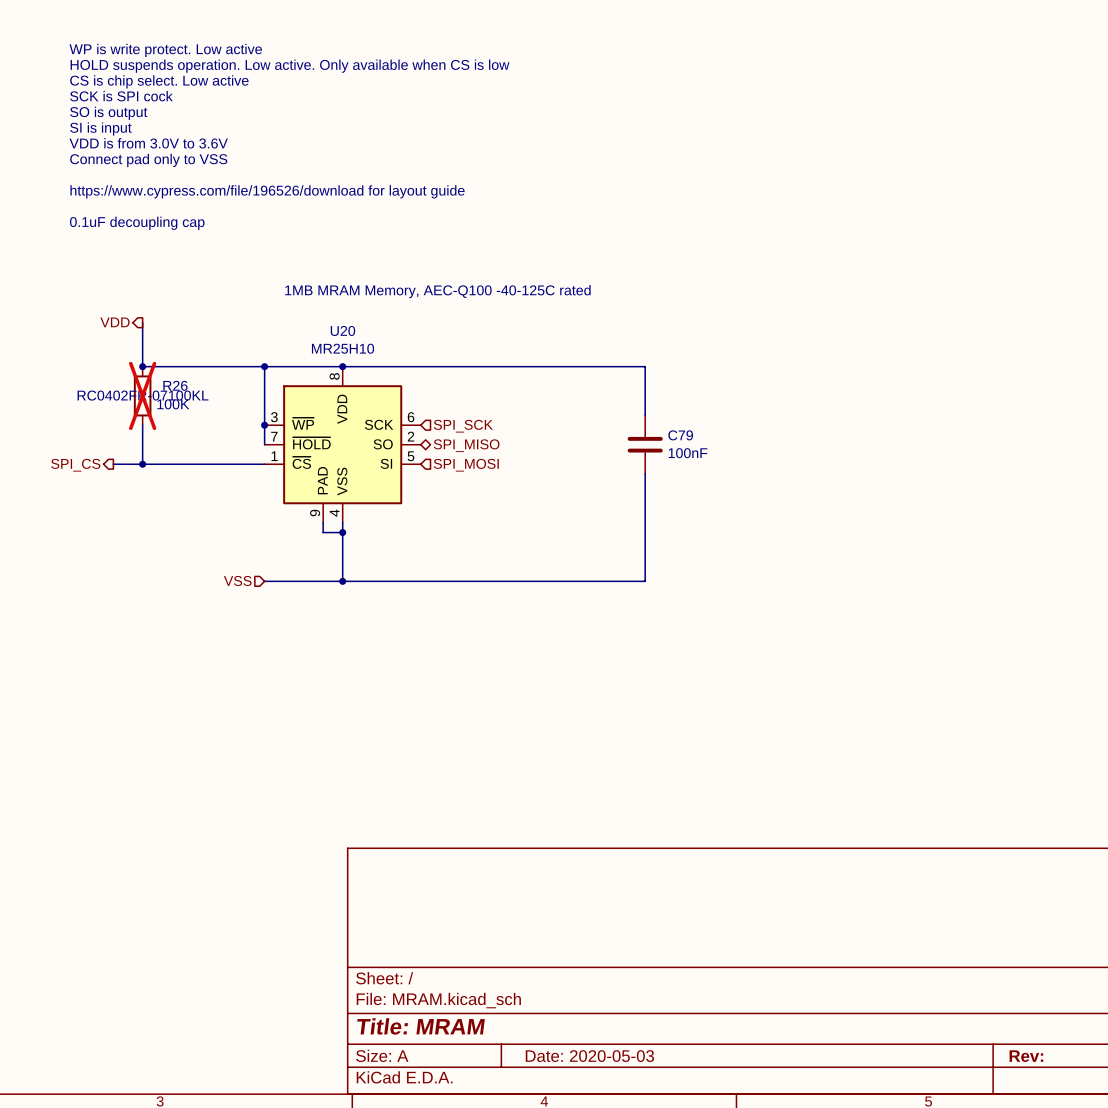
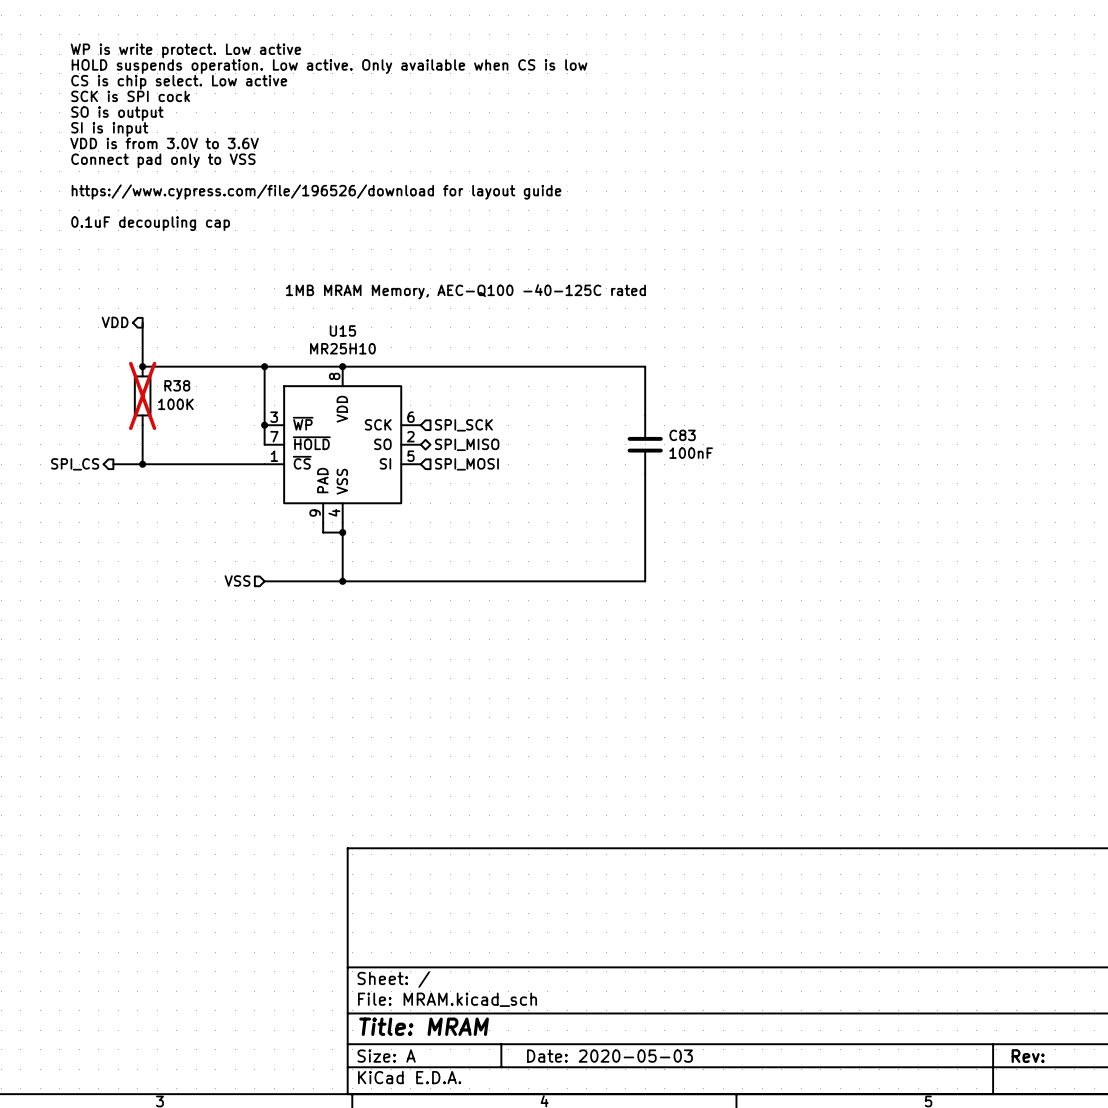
U20 name: U20 (342, 330) -> U15 (342, 330)
R26 name: R26 (175, 385) -> R38 (177, 385)
R26 text: RC0402FR-07100KL (142, 395) -> none
C79 name: C79 (680, 435) -> C83 (682, 435)

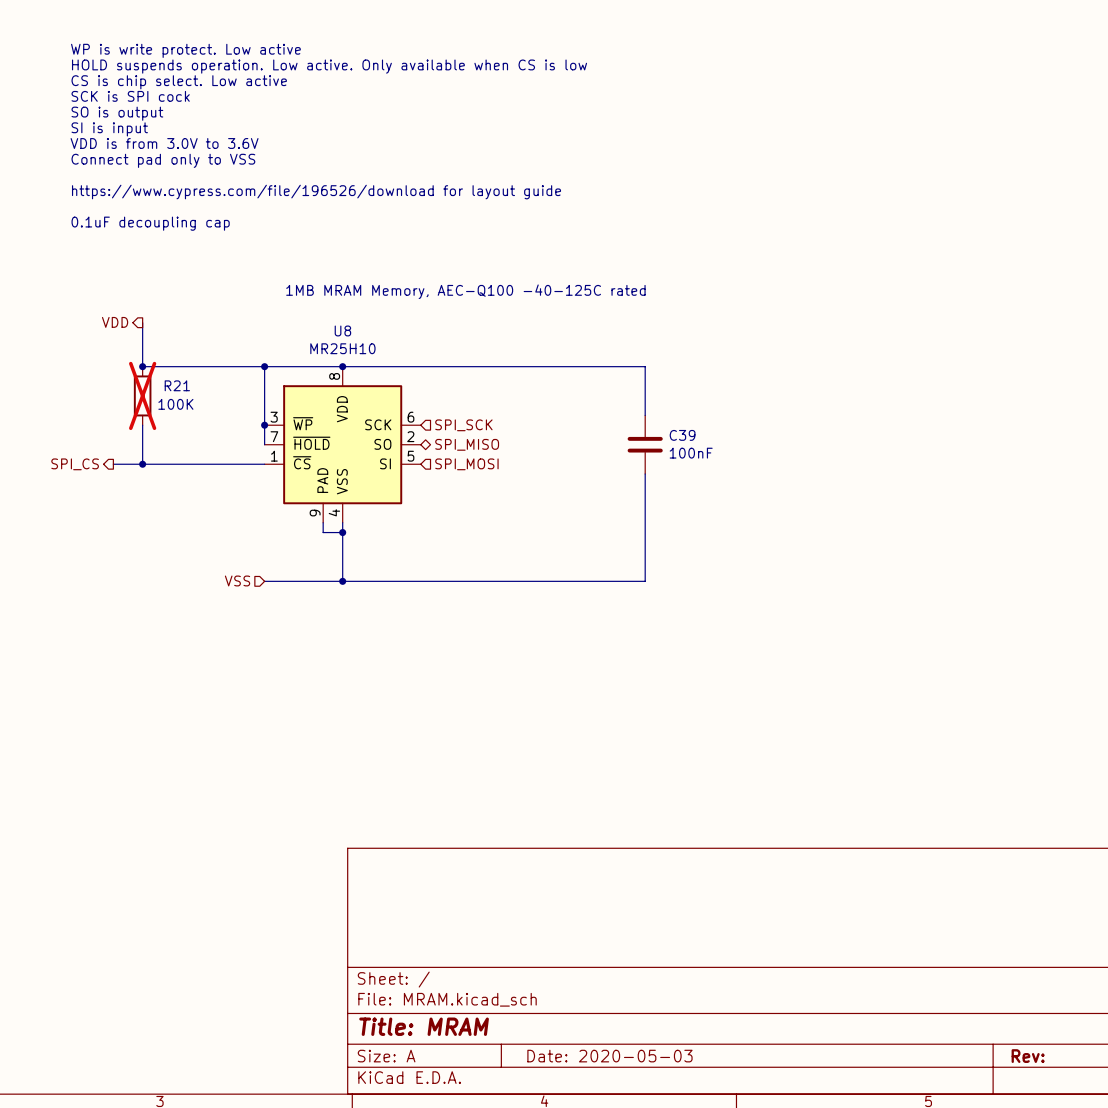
U15 name: U15 (342, 330) -> U8 (342, 330)
R38 name: R38 (177, 385) -> R21 (177, 385)
C83 name: C83 (682, 435) -> C39 (682, 435)

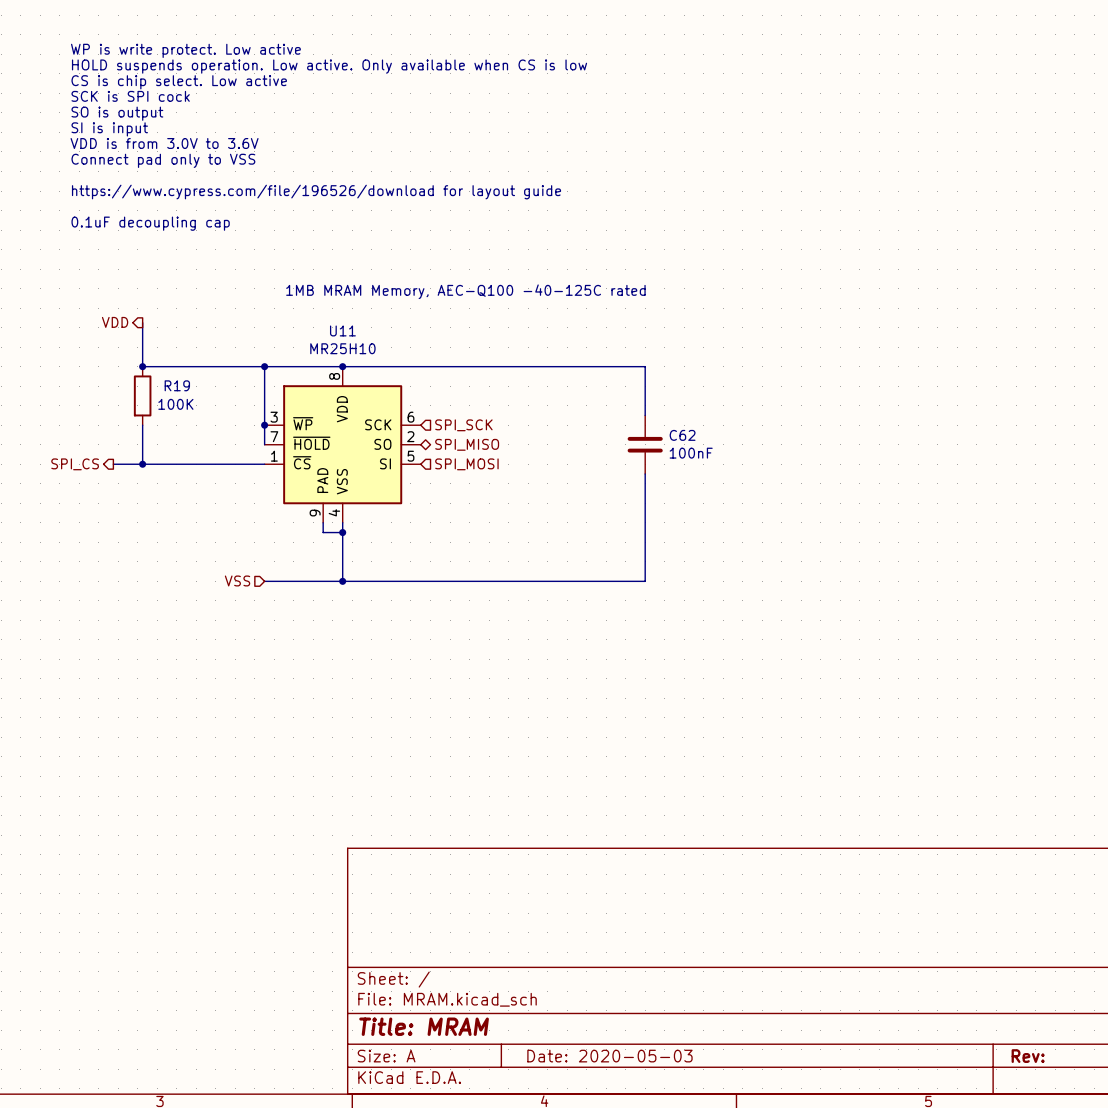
U8 name: U8 (342, 330) -> U11 (342, 330)
R21 name: R21 (177, 385) -> R19 (177, 385)
R21 do-not-place cross: (142, 395) -> none
C39 name: C39 (682, 435) -> C62 (682, 435)

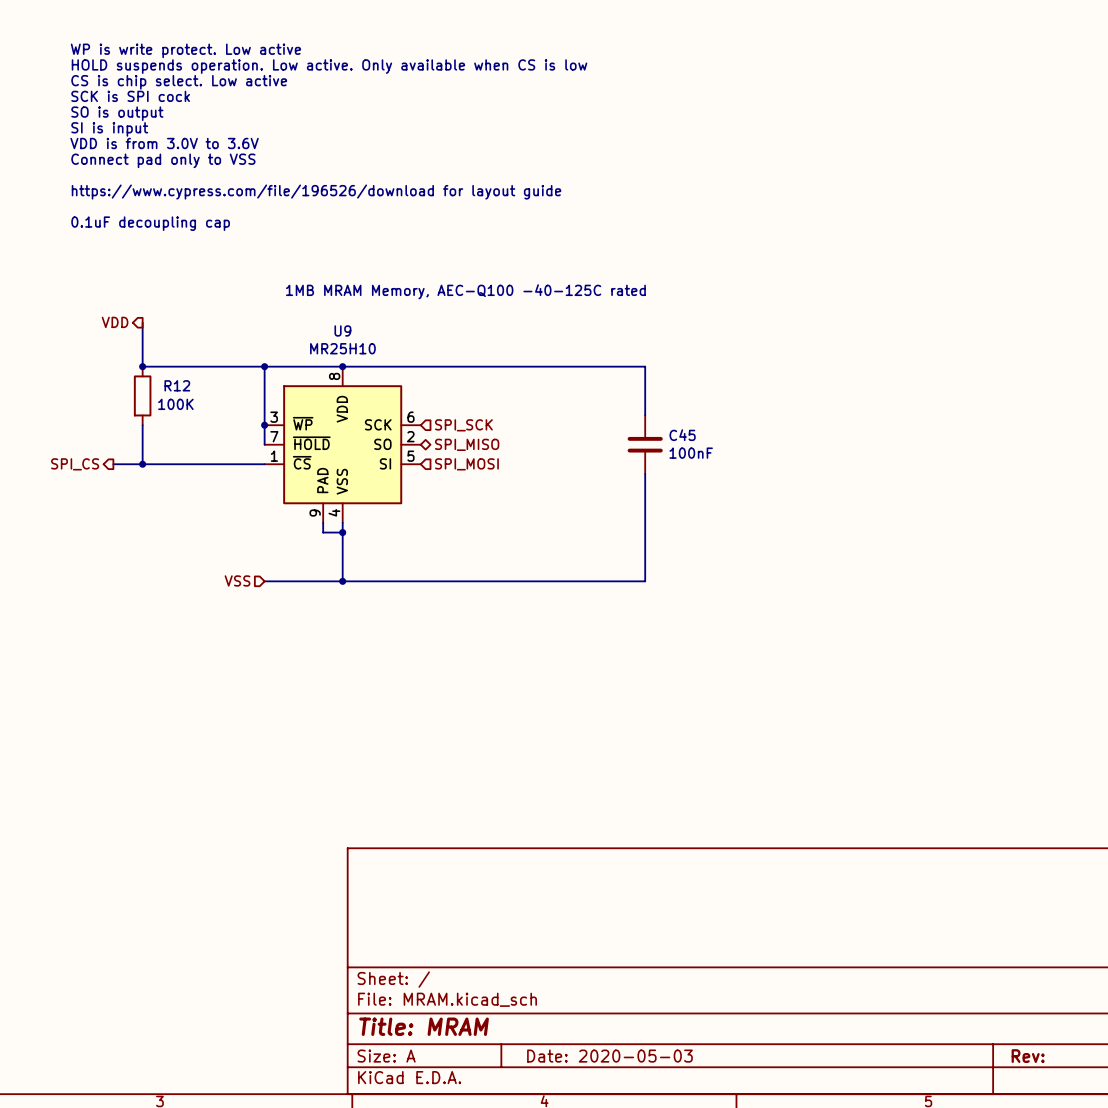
U11 name: U11 (342, 330) -> U9 (342, 330)
R19 name: R19 (177, 385) -> R12 (177, 385)
C62 name: C62 (682, 435) -> C45 (682, 435)

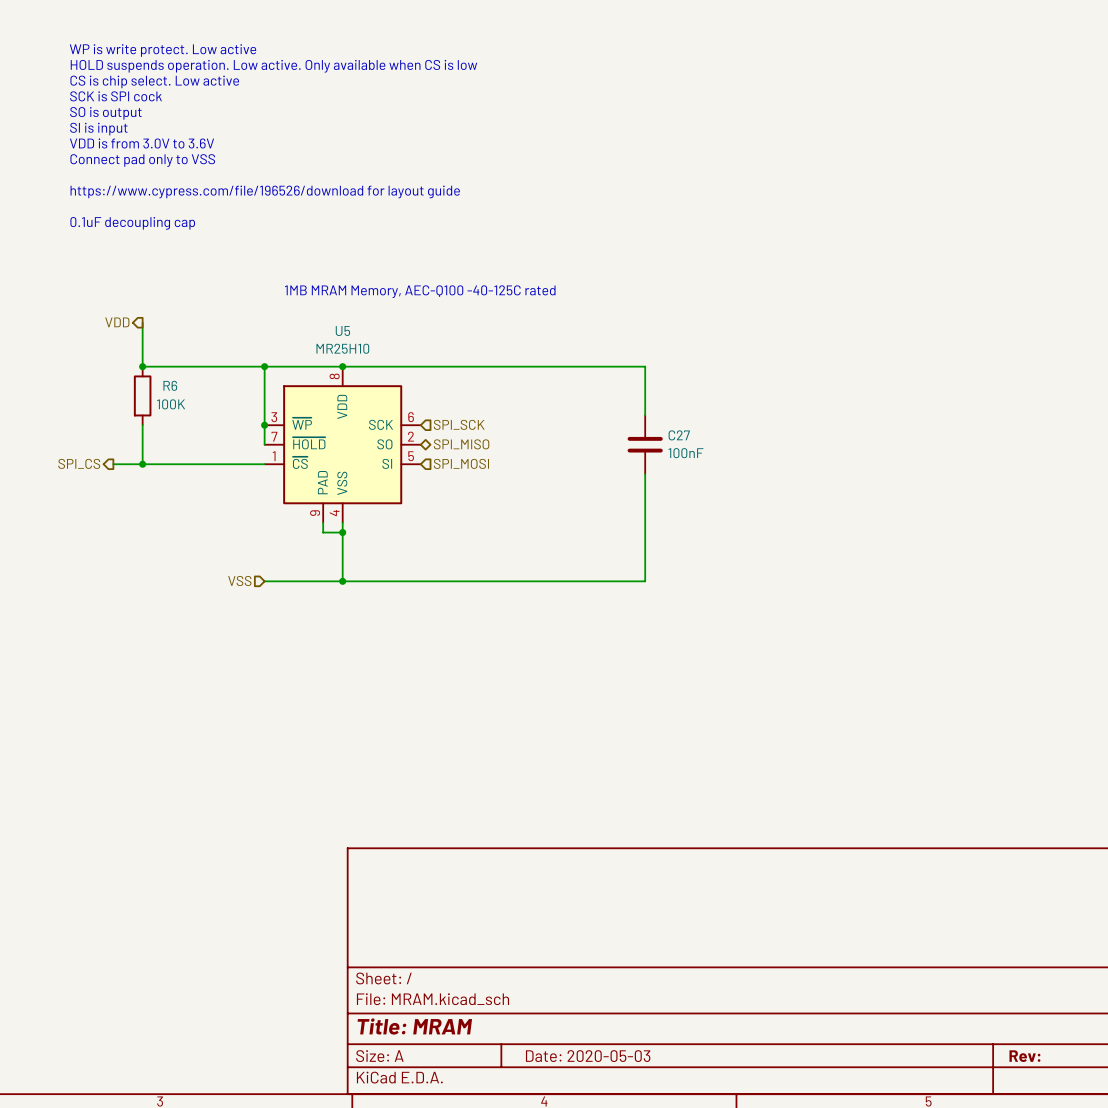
U9 name: U9 (342, 330) -> U5 (342, 331)
R12 name: R12 (177, 385) -> R6 (170, 385)
C45 name: C45 (682, 435) -> C27 (679, 435)

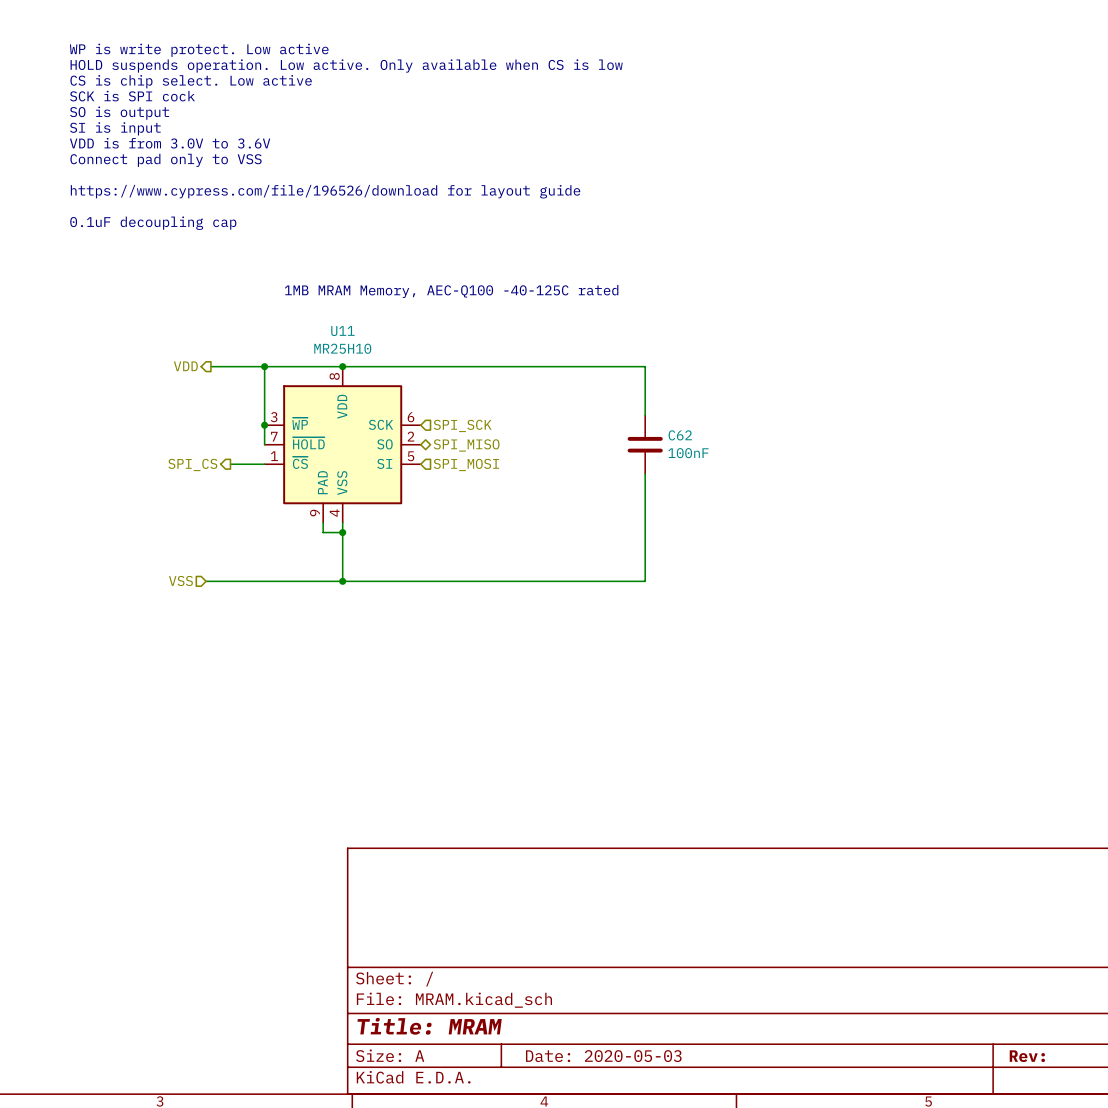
hierarchical label position: VDD (117, 322) -> VDD (185, 366)
wire: (142, 322) (142, 366) (210, 366) -> none
U5 name: U5 (342, 331) -> U11 (342, 331)
junction: (142, 366) -> none
R6: 100K (142, 395) -> none
wire: (142, 425) (142, 464) -> none
C27 name: C27 (679, 435) -> C62 (680, 435)
hierarchical label position: SPI_CS (79, 463) -> SPI_CS (192, 464)
wire: (113, 464) (230, 464) -> none
junction: (142, 464) -> none
hierarchical label position: VSS (239, 580) -> VSS (180, 580)
wire: none -> (206, 581) (264, 581)

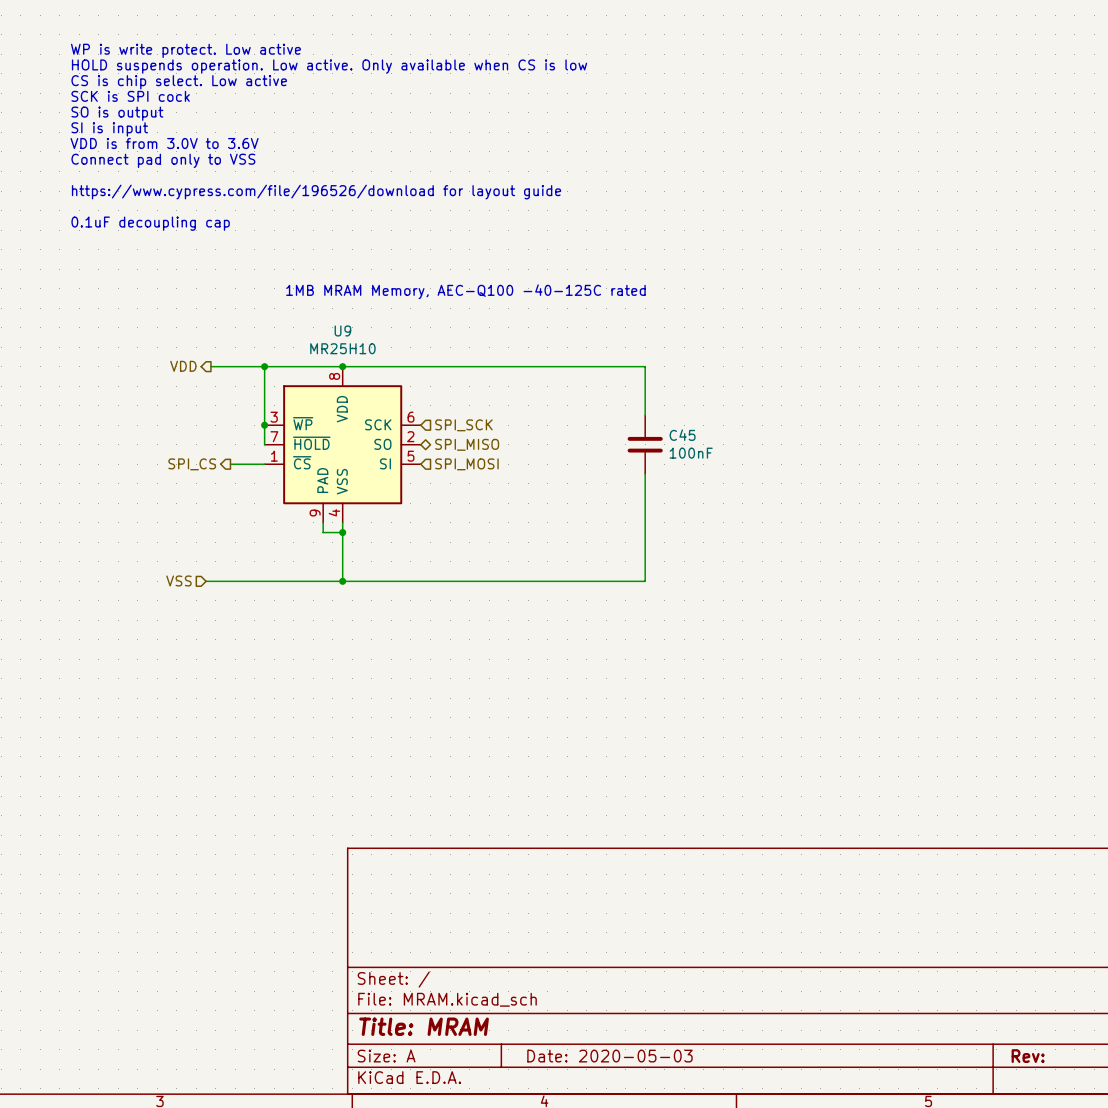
U11 name: U11 (342, 331) -> U9 (342, 330)
C62 name: C62 (680, 435) -> C45 (682, 435)

